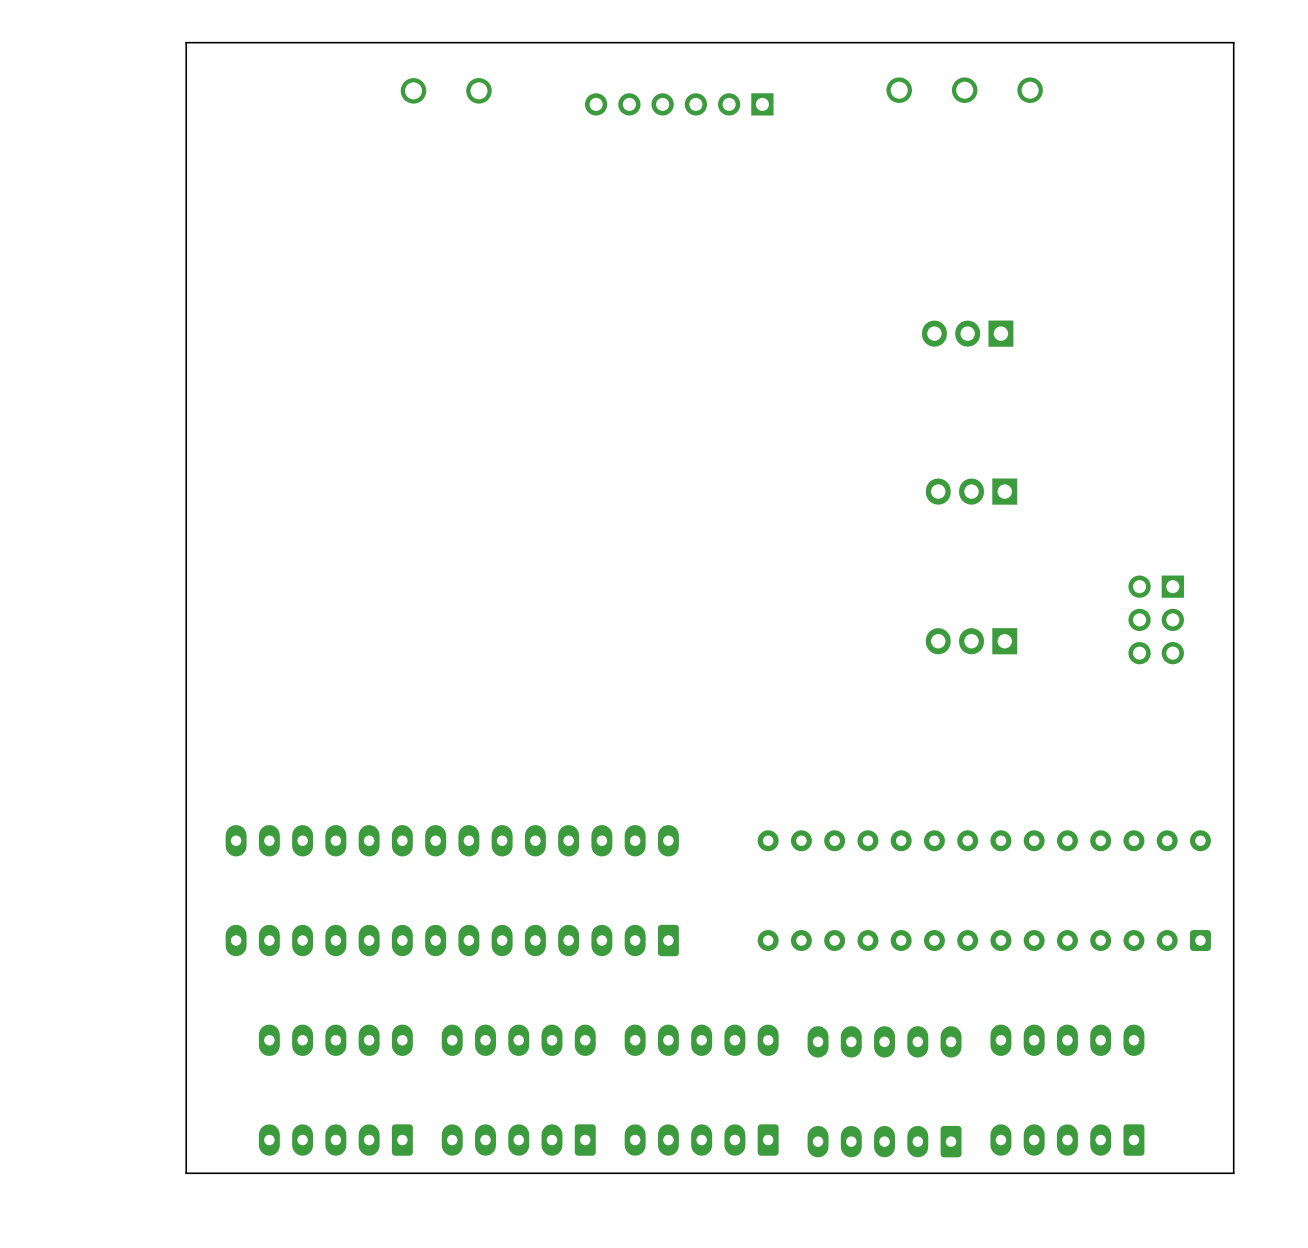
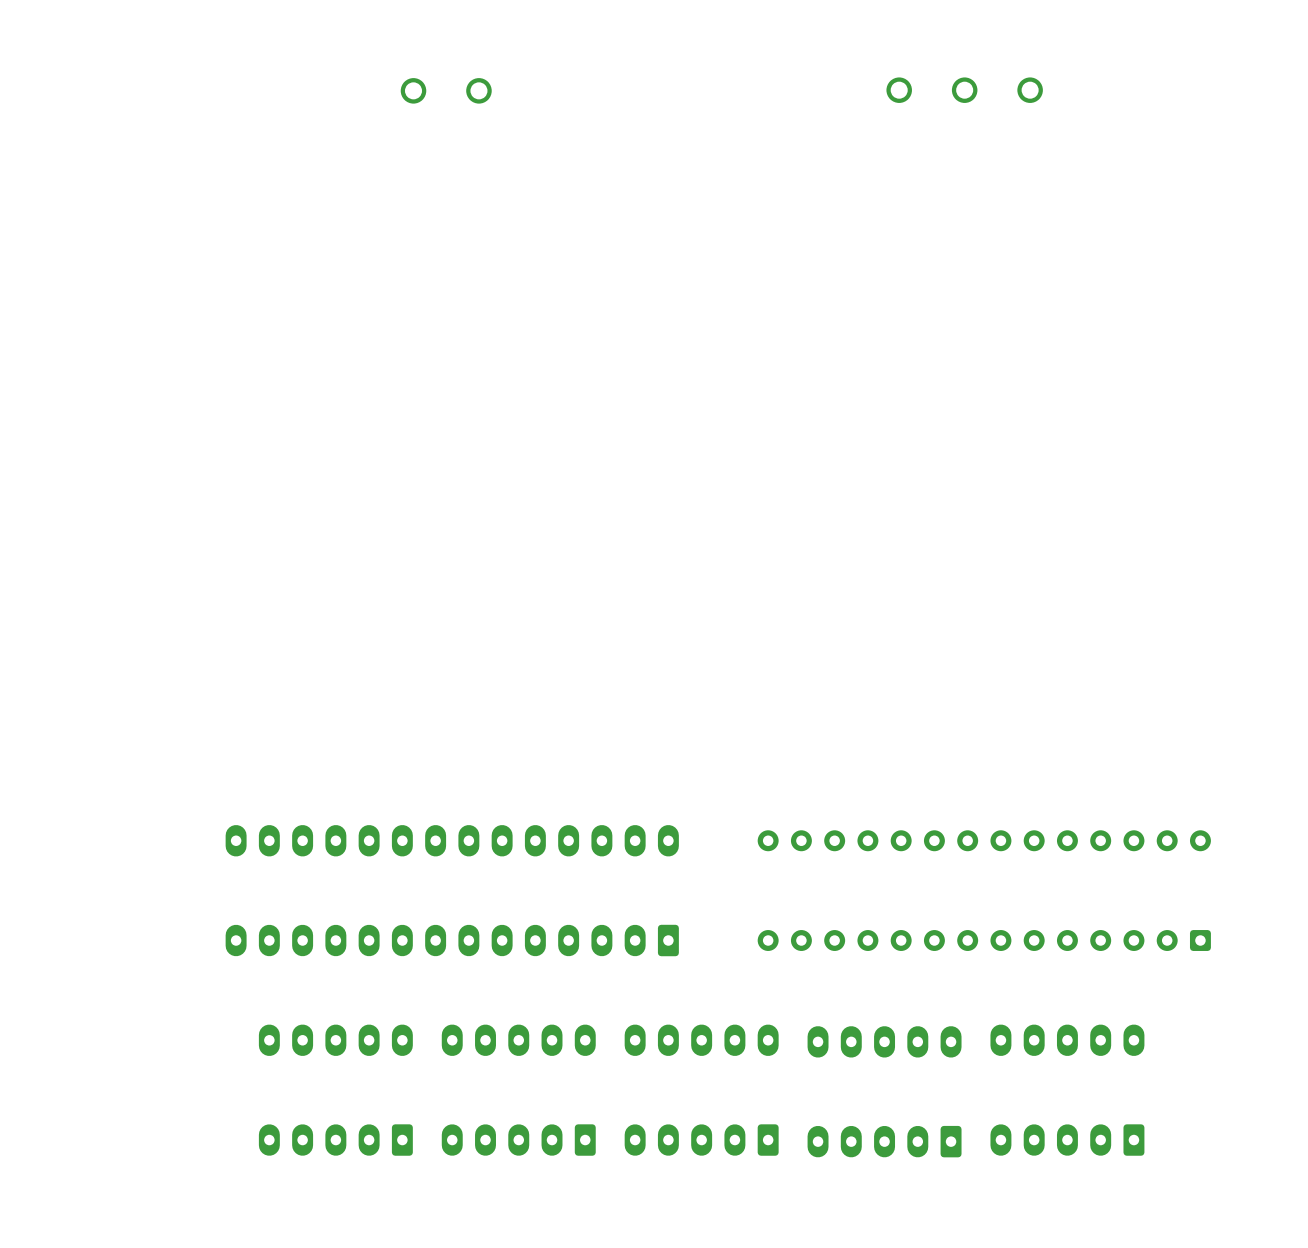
board edge: (1233, 42) (186, 42) (186, 1173) (1233, 1173) (1233, 42) -> none
part: (679, 104) -> none
part: (967, 333) -> none
part: (971, 491) -> none
part: (1156, 619) -> none
part: (971, 641) -> none

